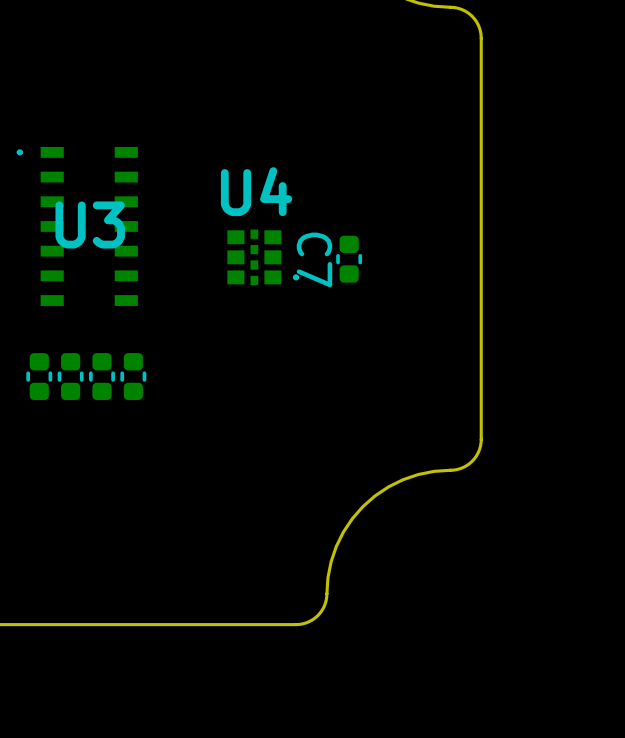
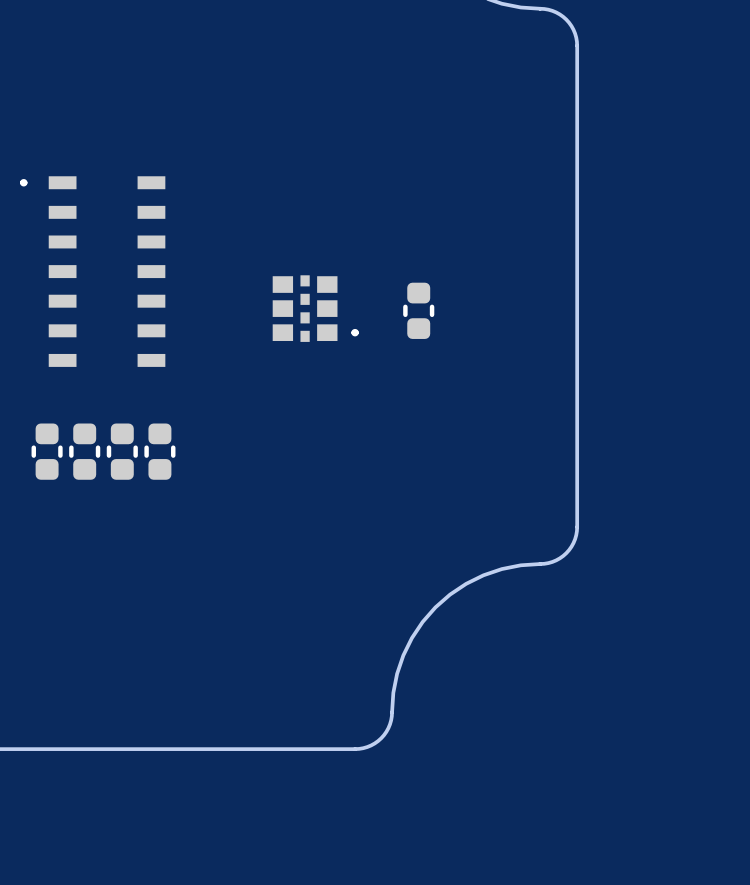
U4 name: U4 (256, 191) -> none
U3 name: U3 (90, 224) -> none
C7 name: C7 (314, 259) -> none

